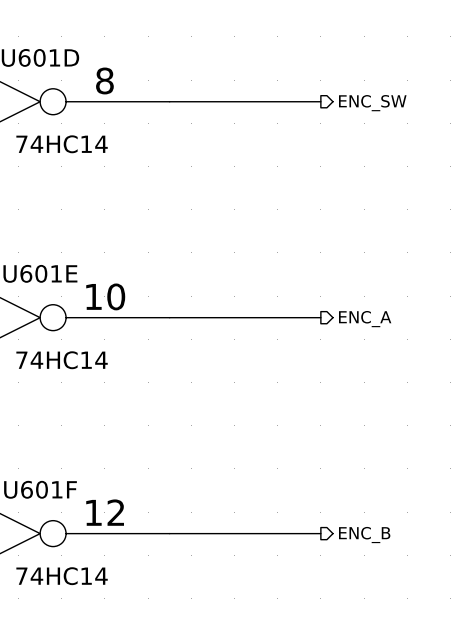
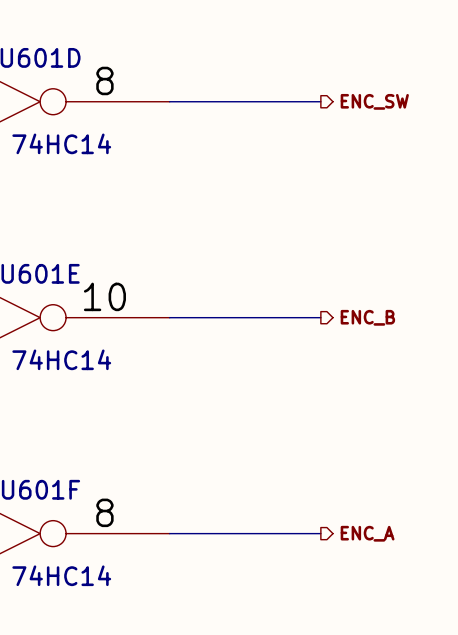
hierarchical label: ENC_A (365, 319) -> ENC_B (367, 317)
U601F pin number: 12 (105, 512) -> 8 (104, 512)
hierarchical label: ENC_B (364, 535) -> ENC_A (367, 533)

